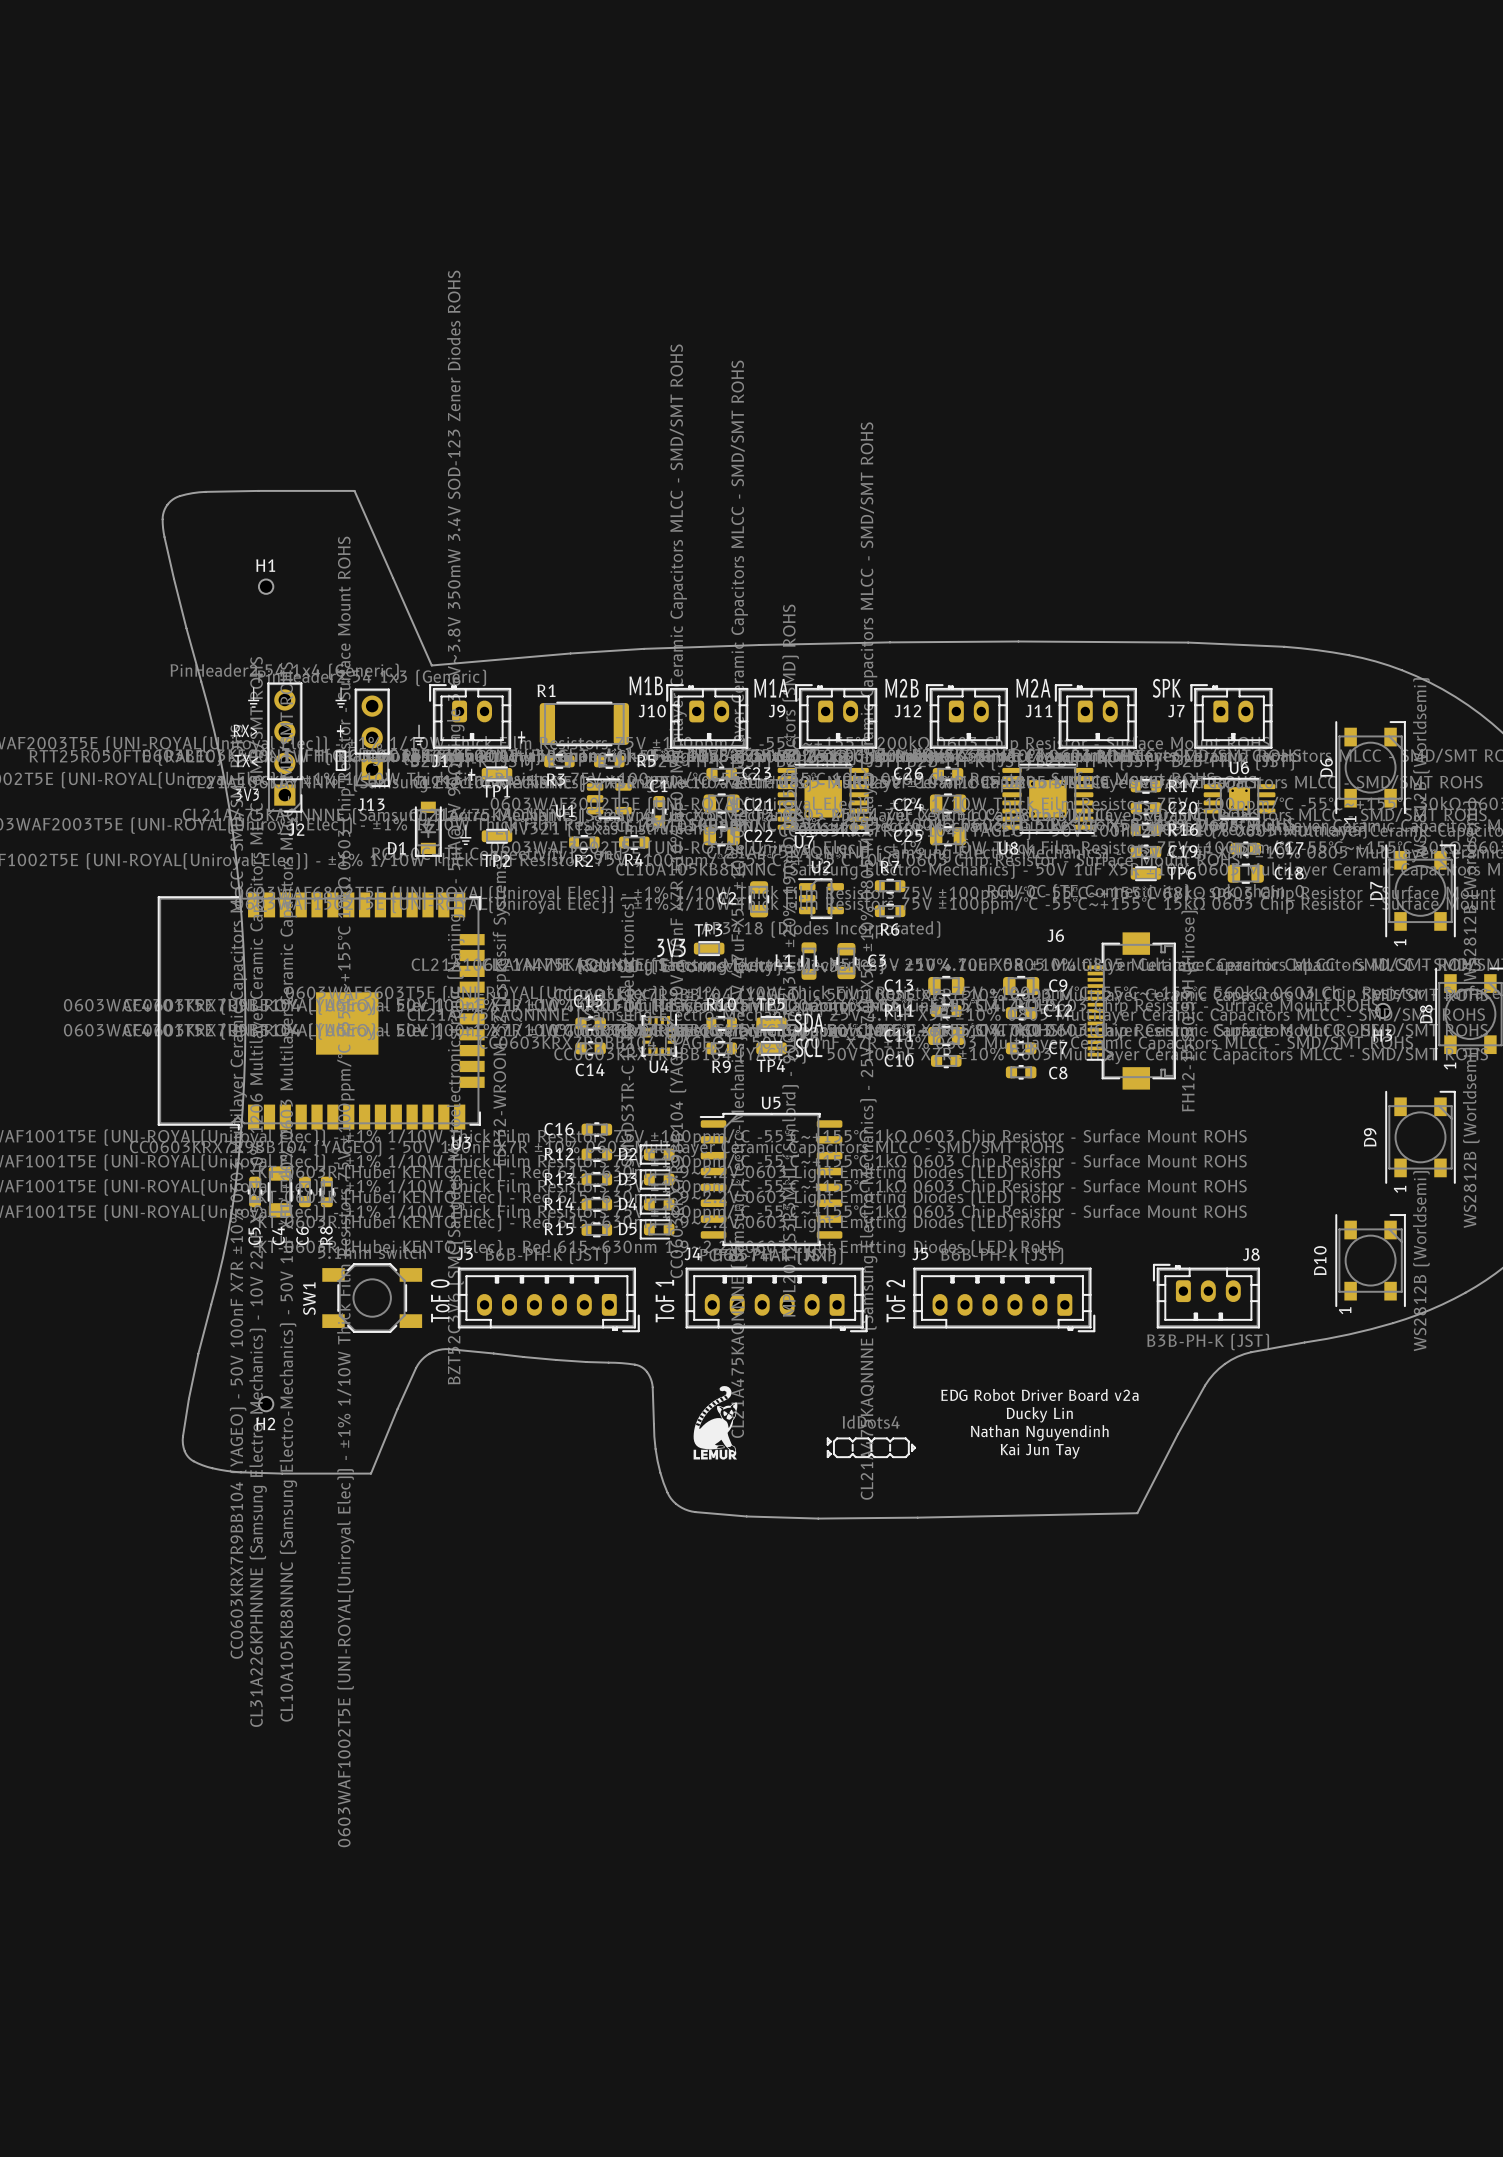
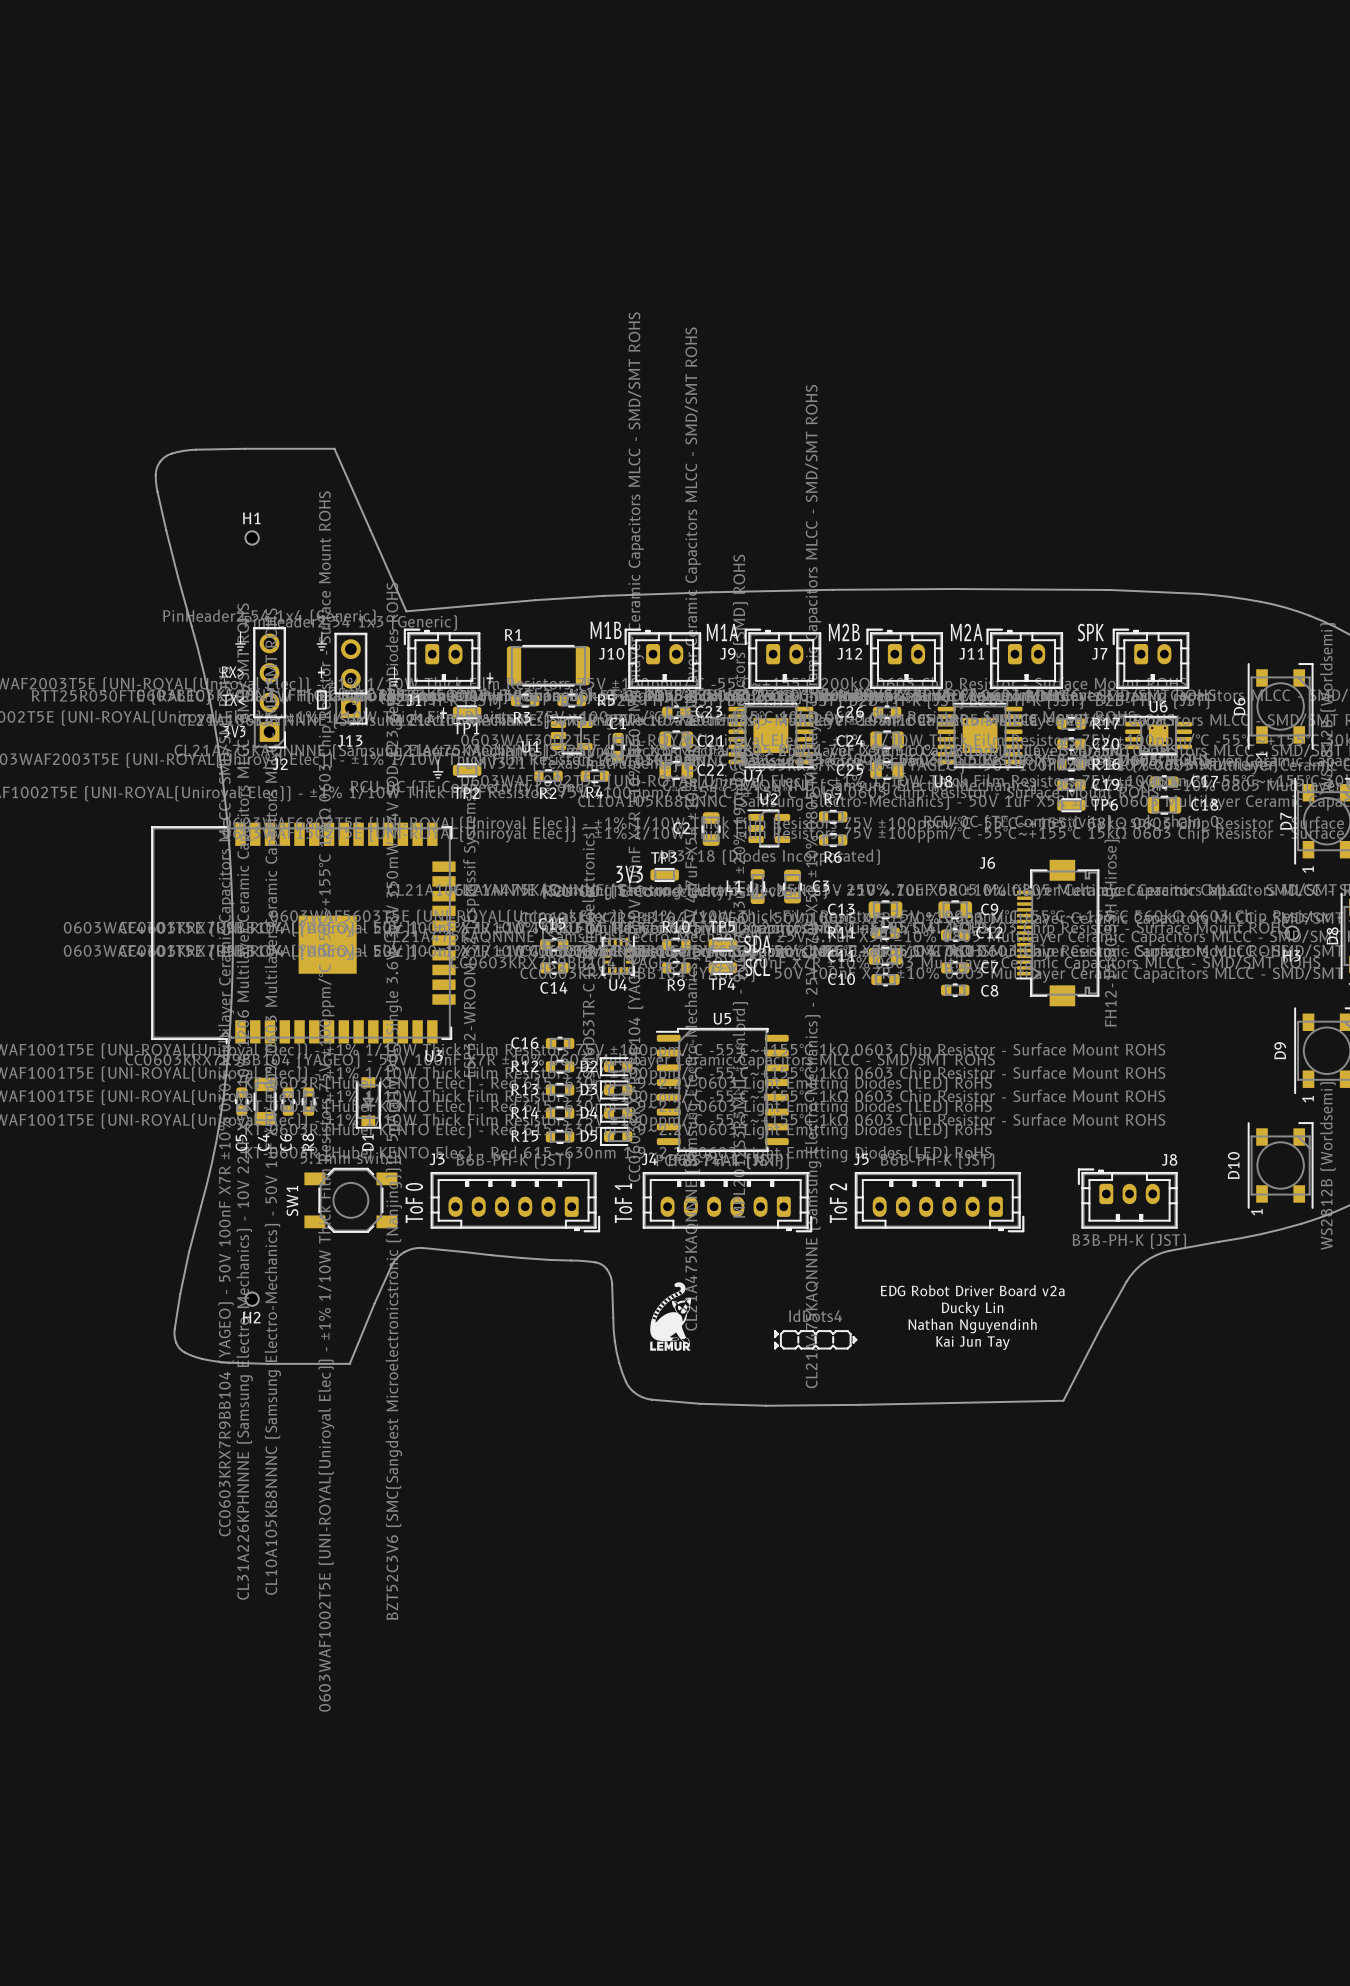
D1 position: (428, 829) -> (368, 1102)
D1 name rotation: 0° (396, 848) -> 90° counterclockwise (367, 1142)
D1 name position: D1 (396, 848) -> D1 (367, 1142)

